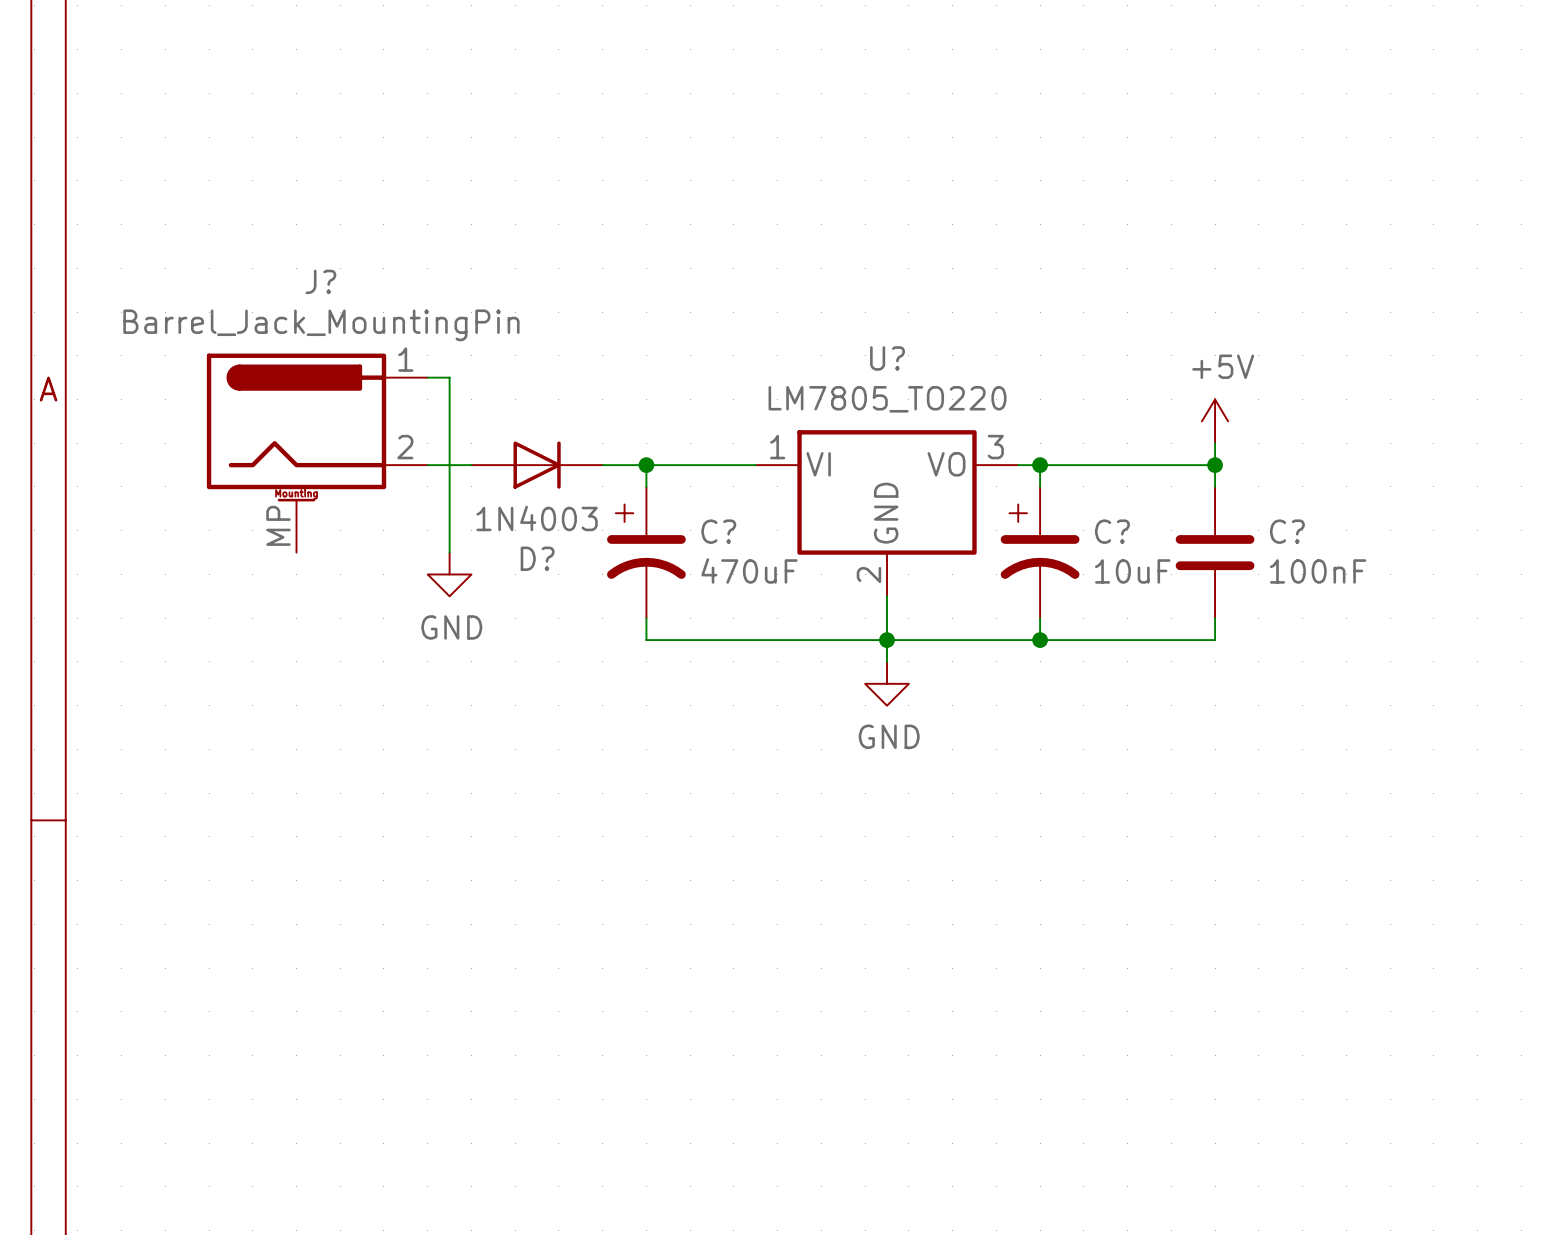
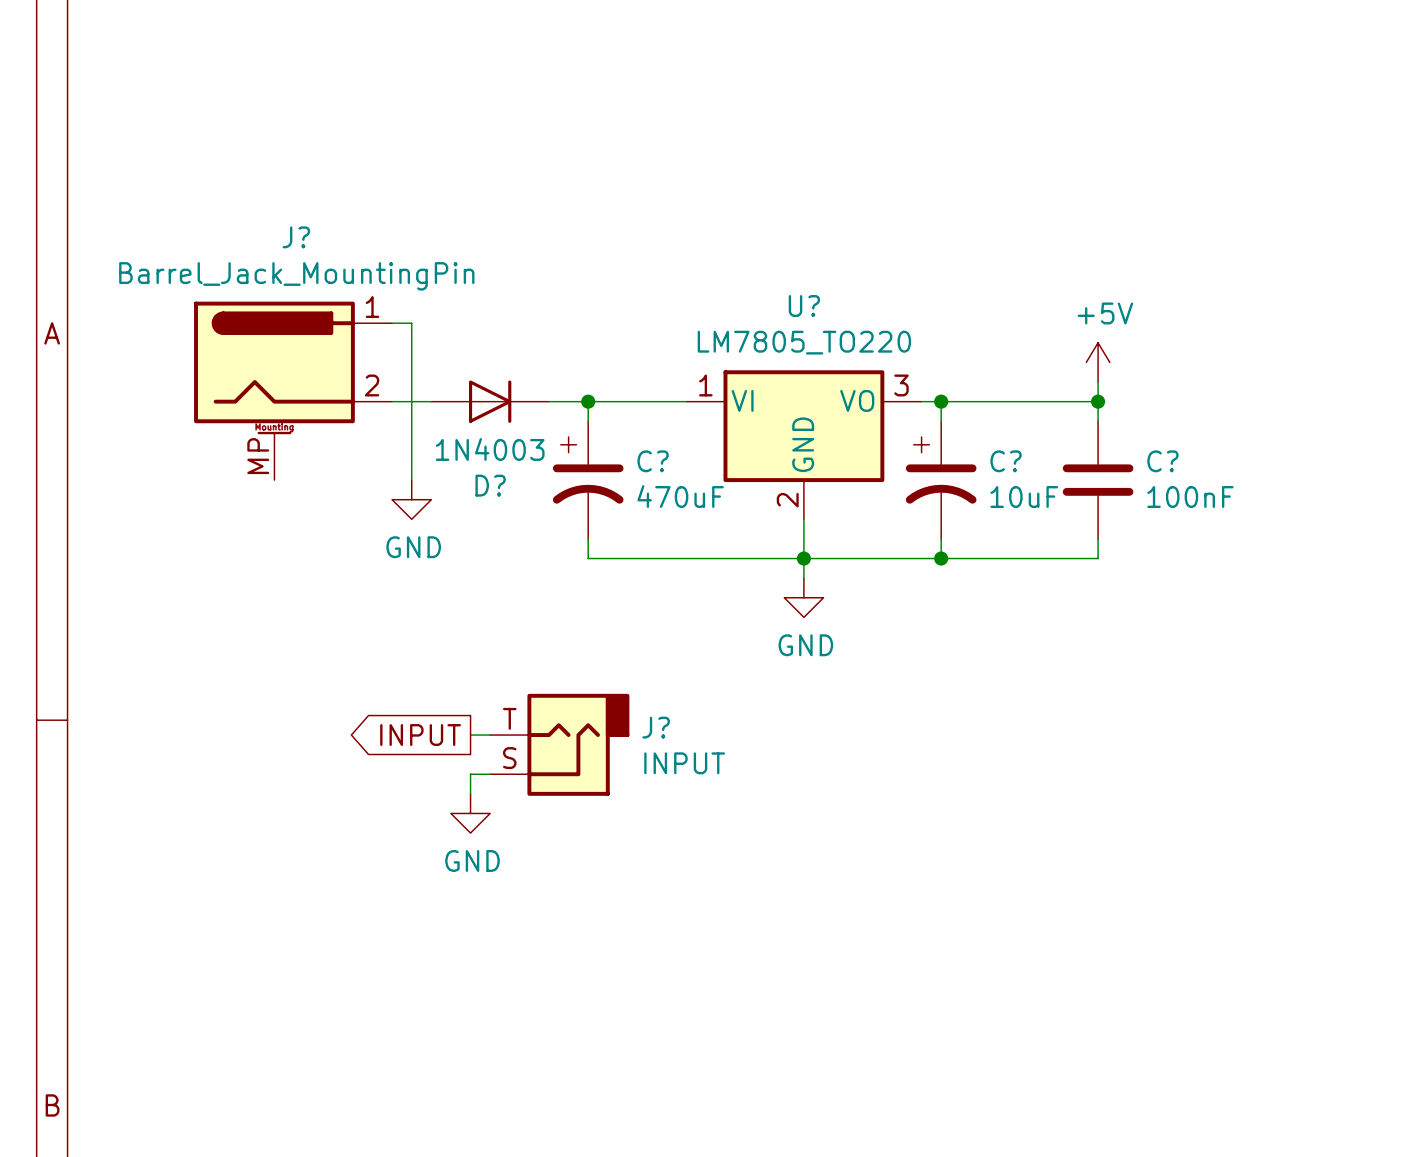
global label: none -> INPUT (420, 735)
wire: none -> (470, 735) (490, 735)
J?: none -> INPUT (559, 744)
wire: none -> (490, 774) (470, 774) (470, 793)
power symbol: none -> GND (470, 813)

